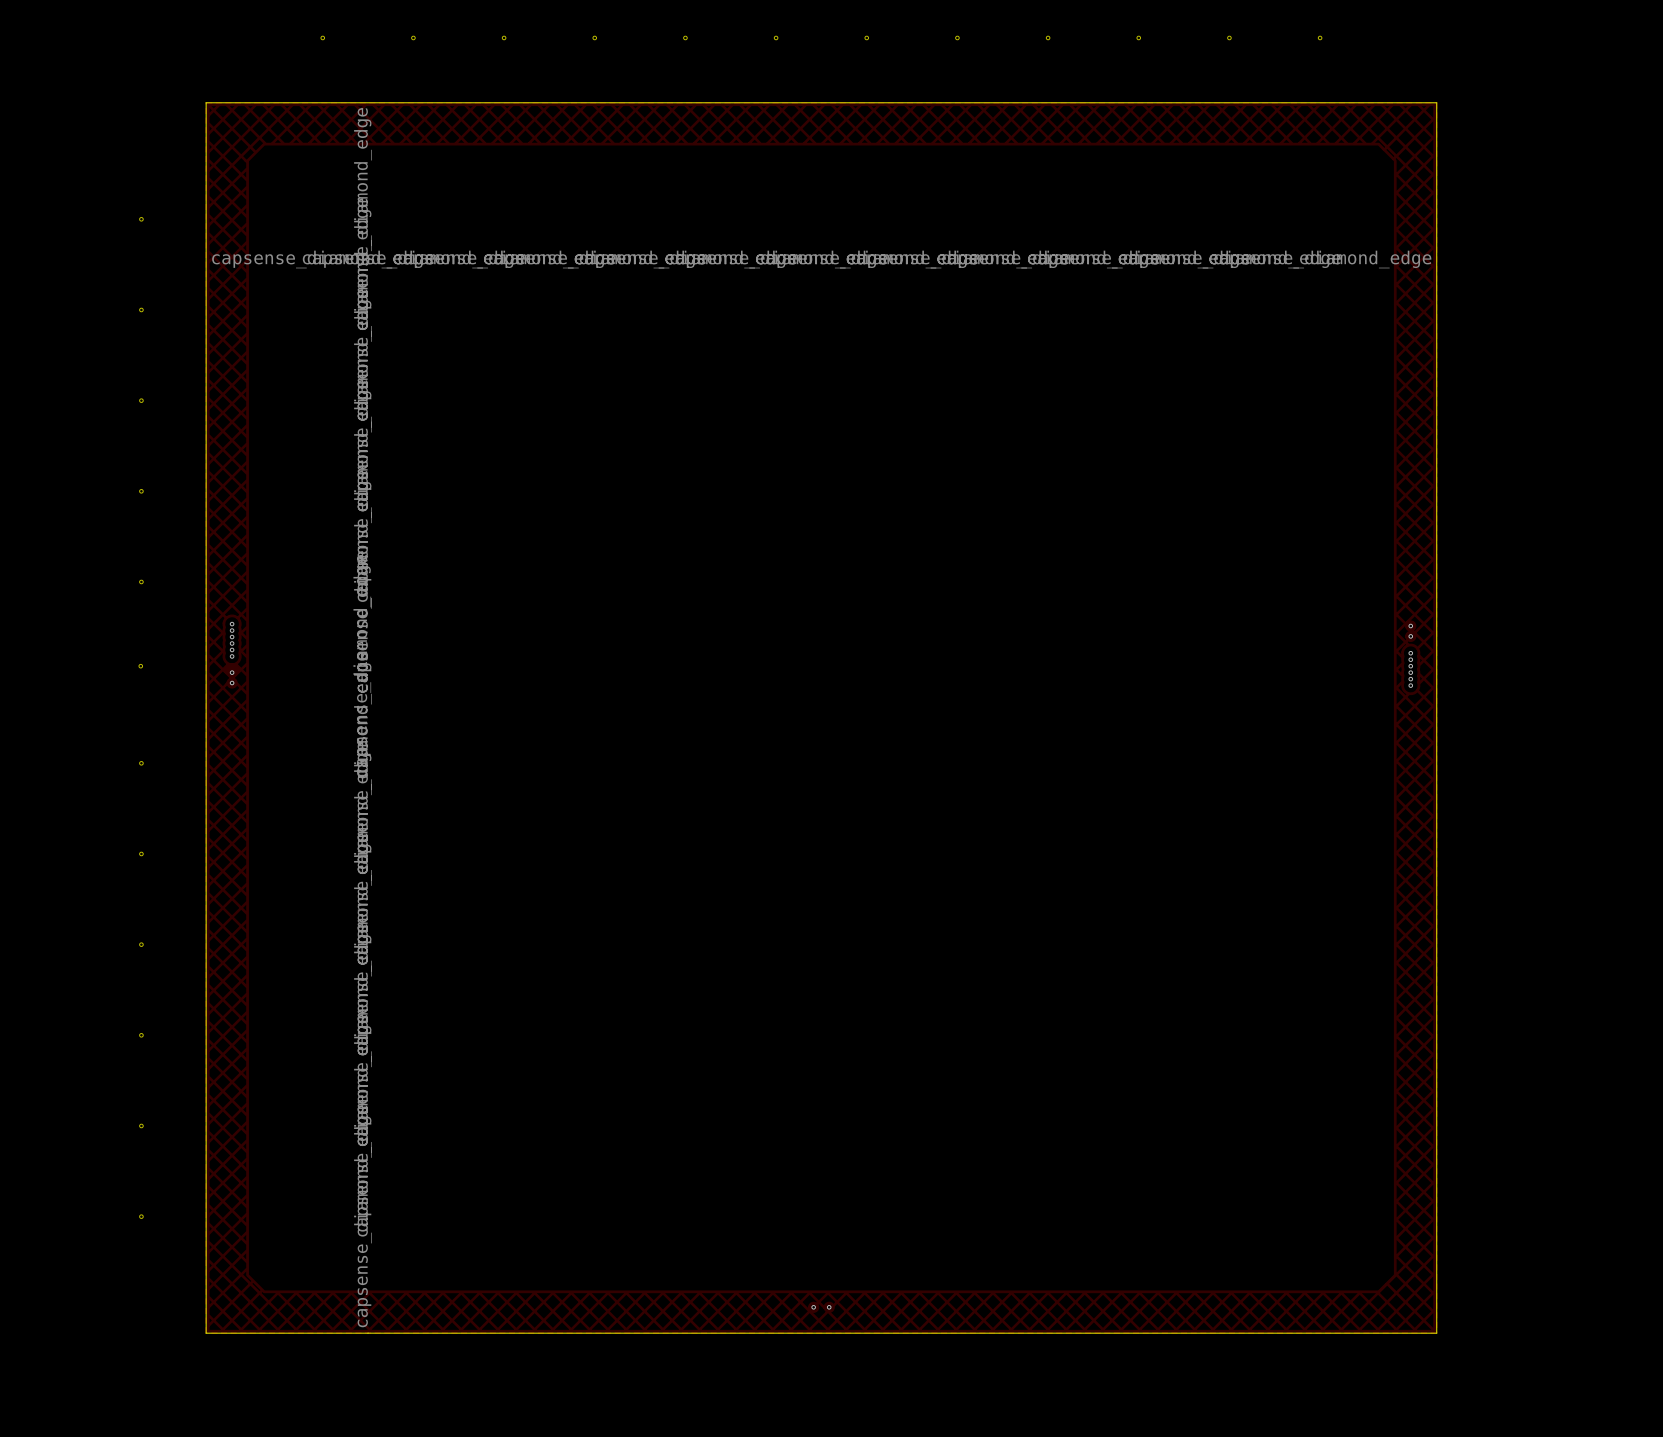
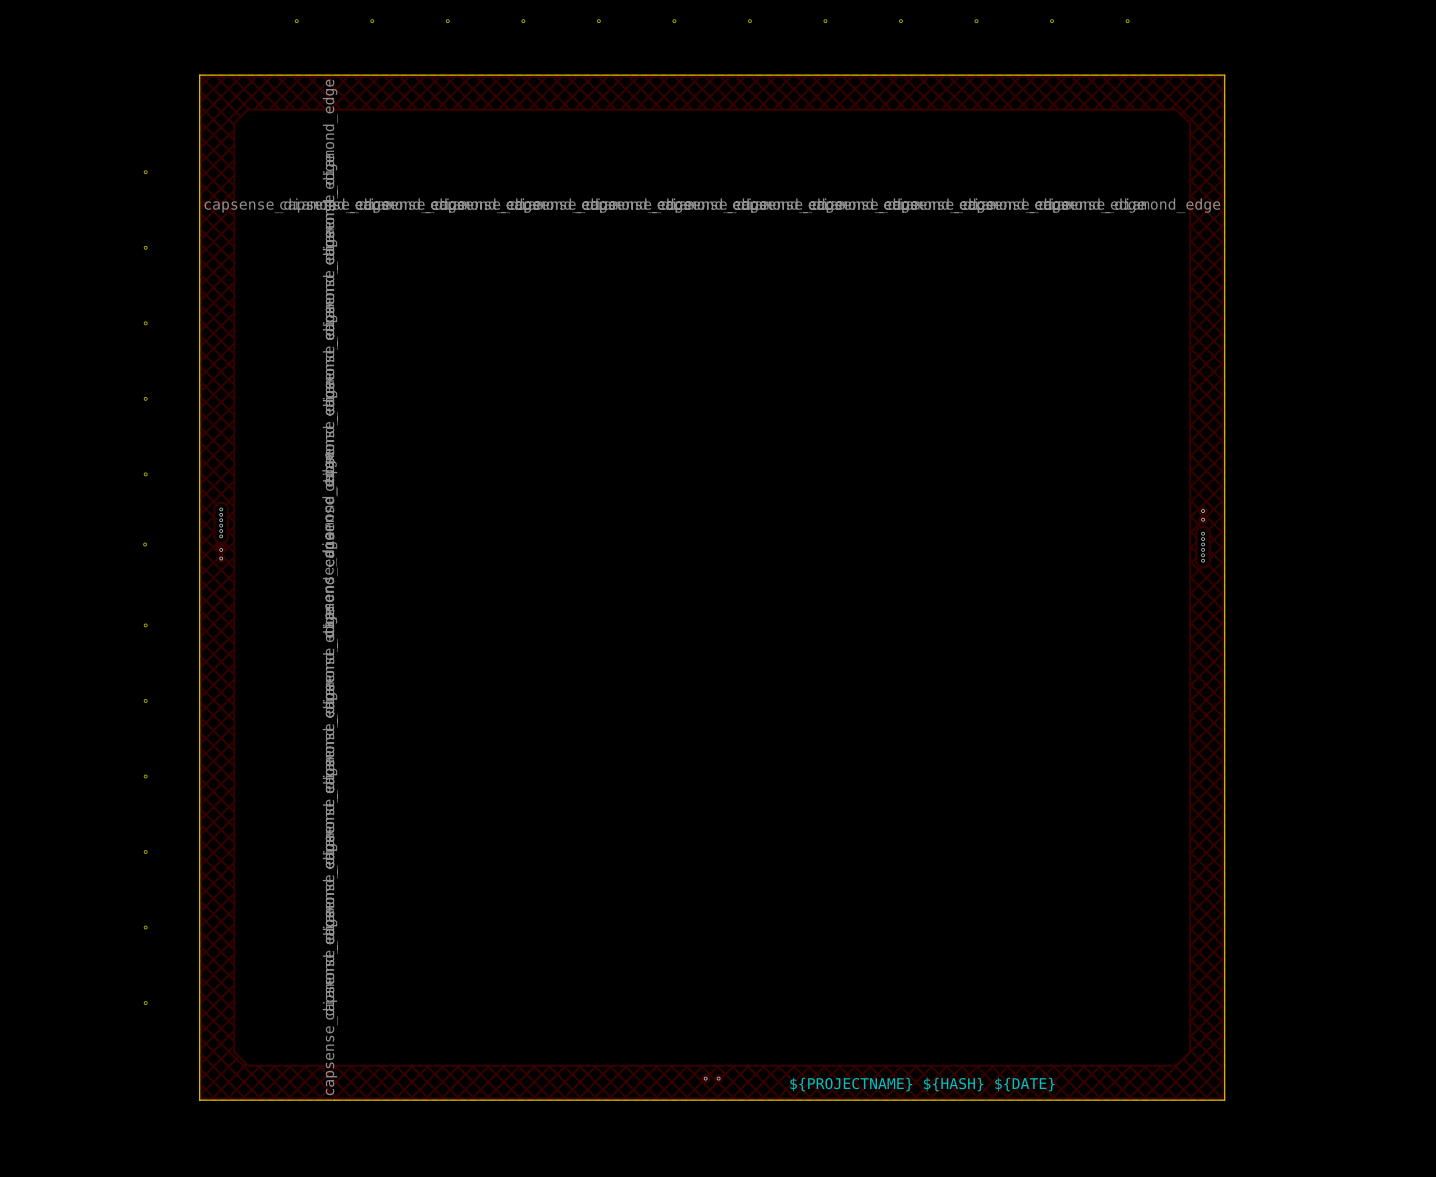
text: none -> ${PROJECTNAME} ${HASH} ${DATE} (922, 1084)

